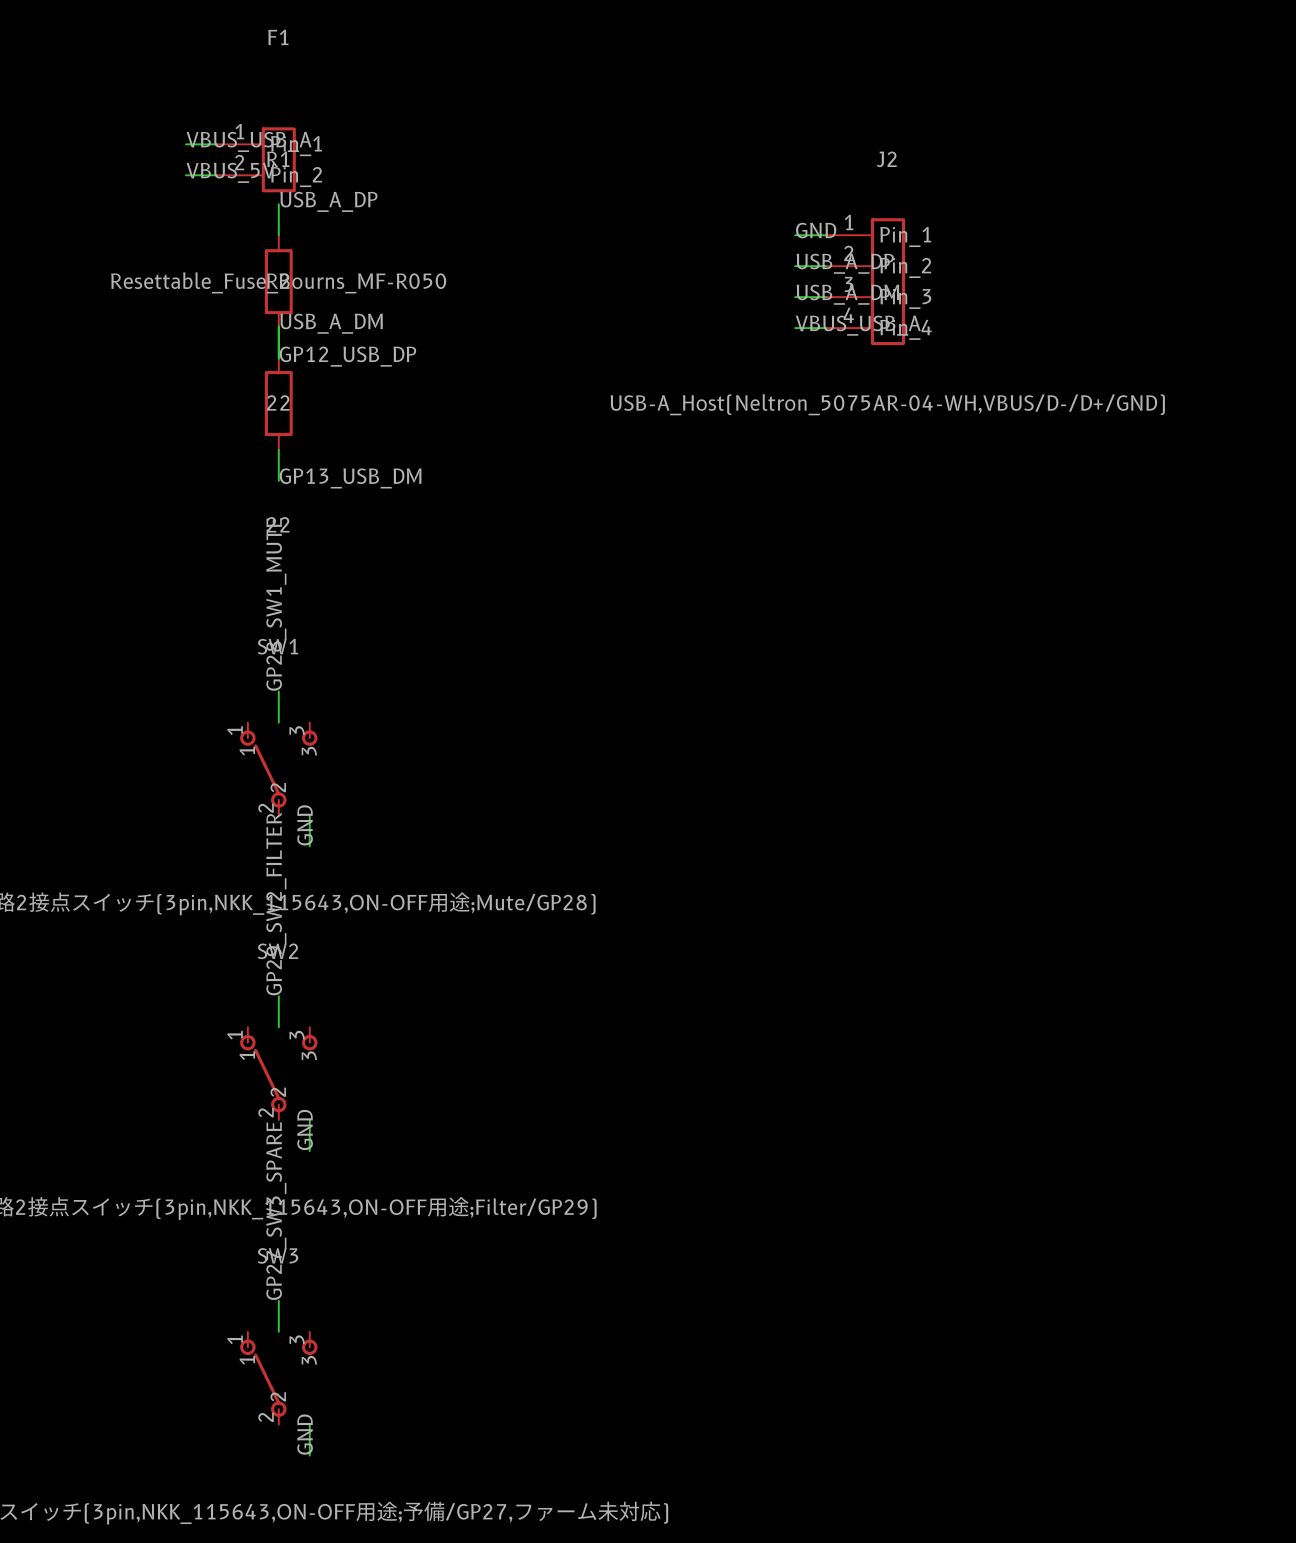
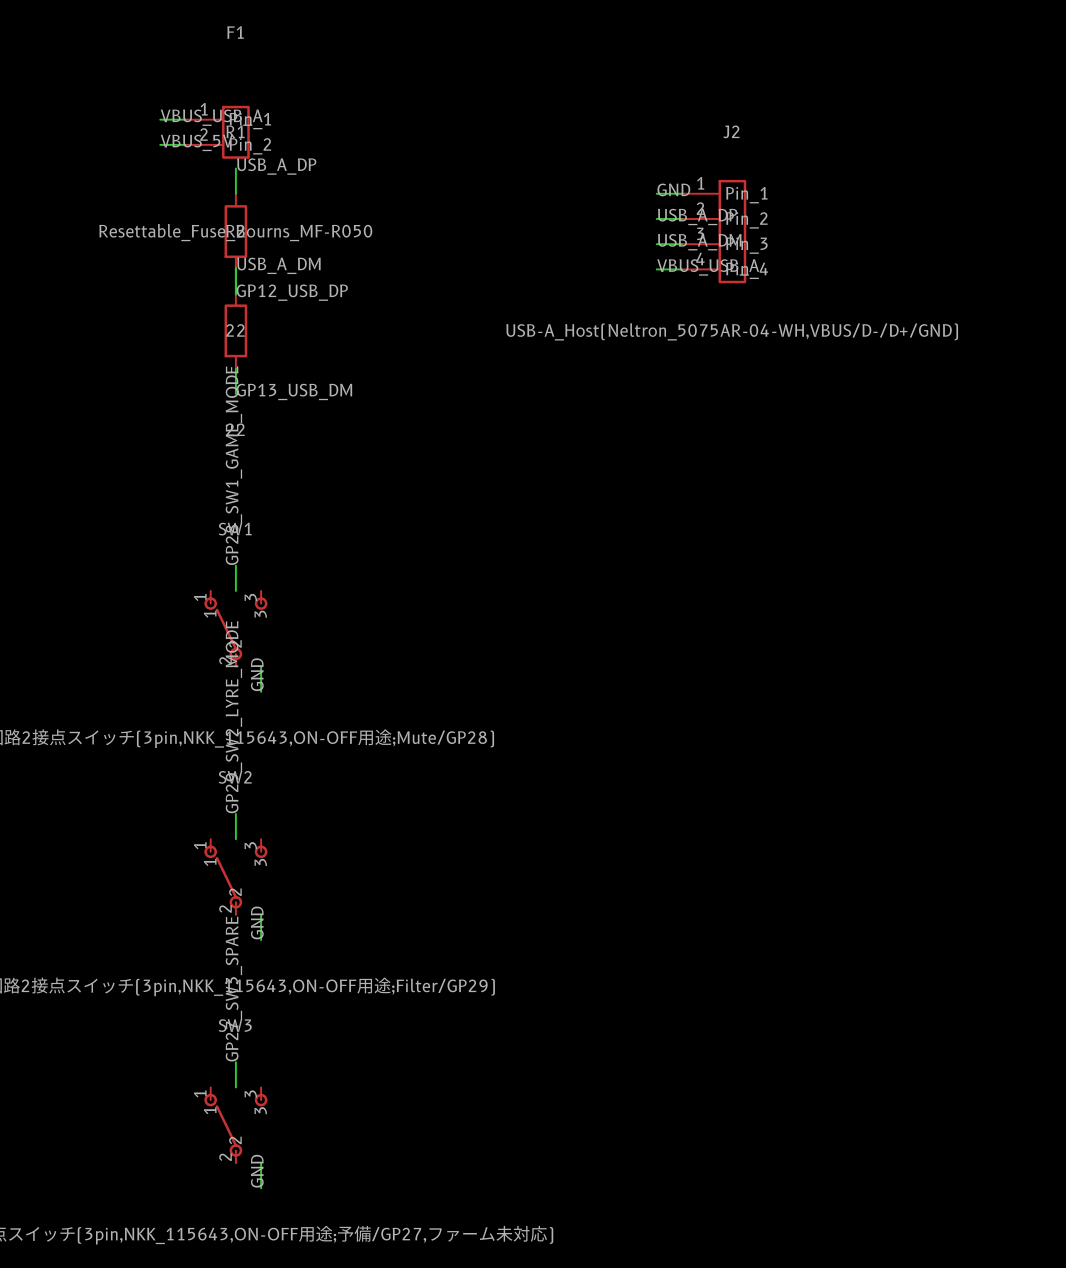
label: GP28_SW1_MUTE (276, 604) -> GP28_SW1_GAME_MODE (233, 465)
label: GP29_SW2_FILTER (276, 904) -> GP29_SW2_LYRE_MODE (233, 717)

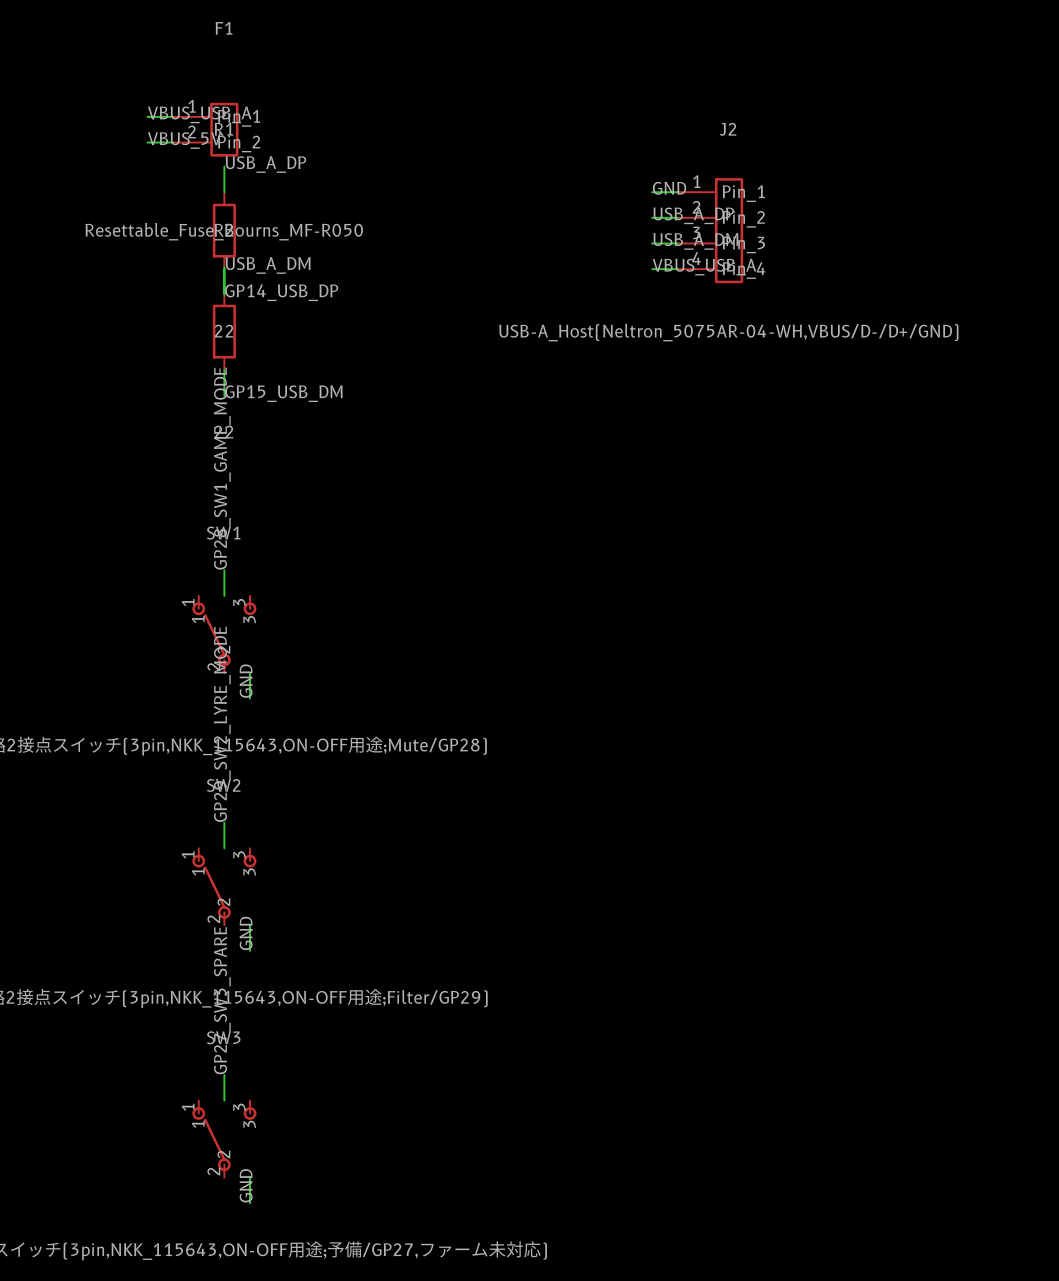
label: GP12_USB_DP (292, 292) -> GP14_USB_DP (281, 292)
label: GP13_USB_DM (294, 391) -> GP15_USB_DM (283, 393)

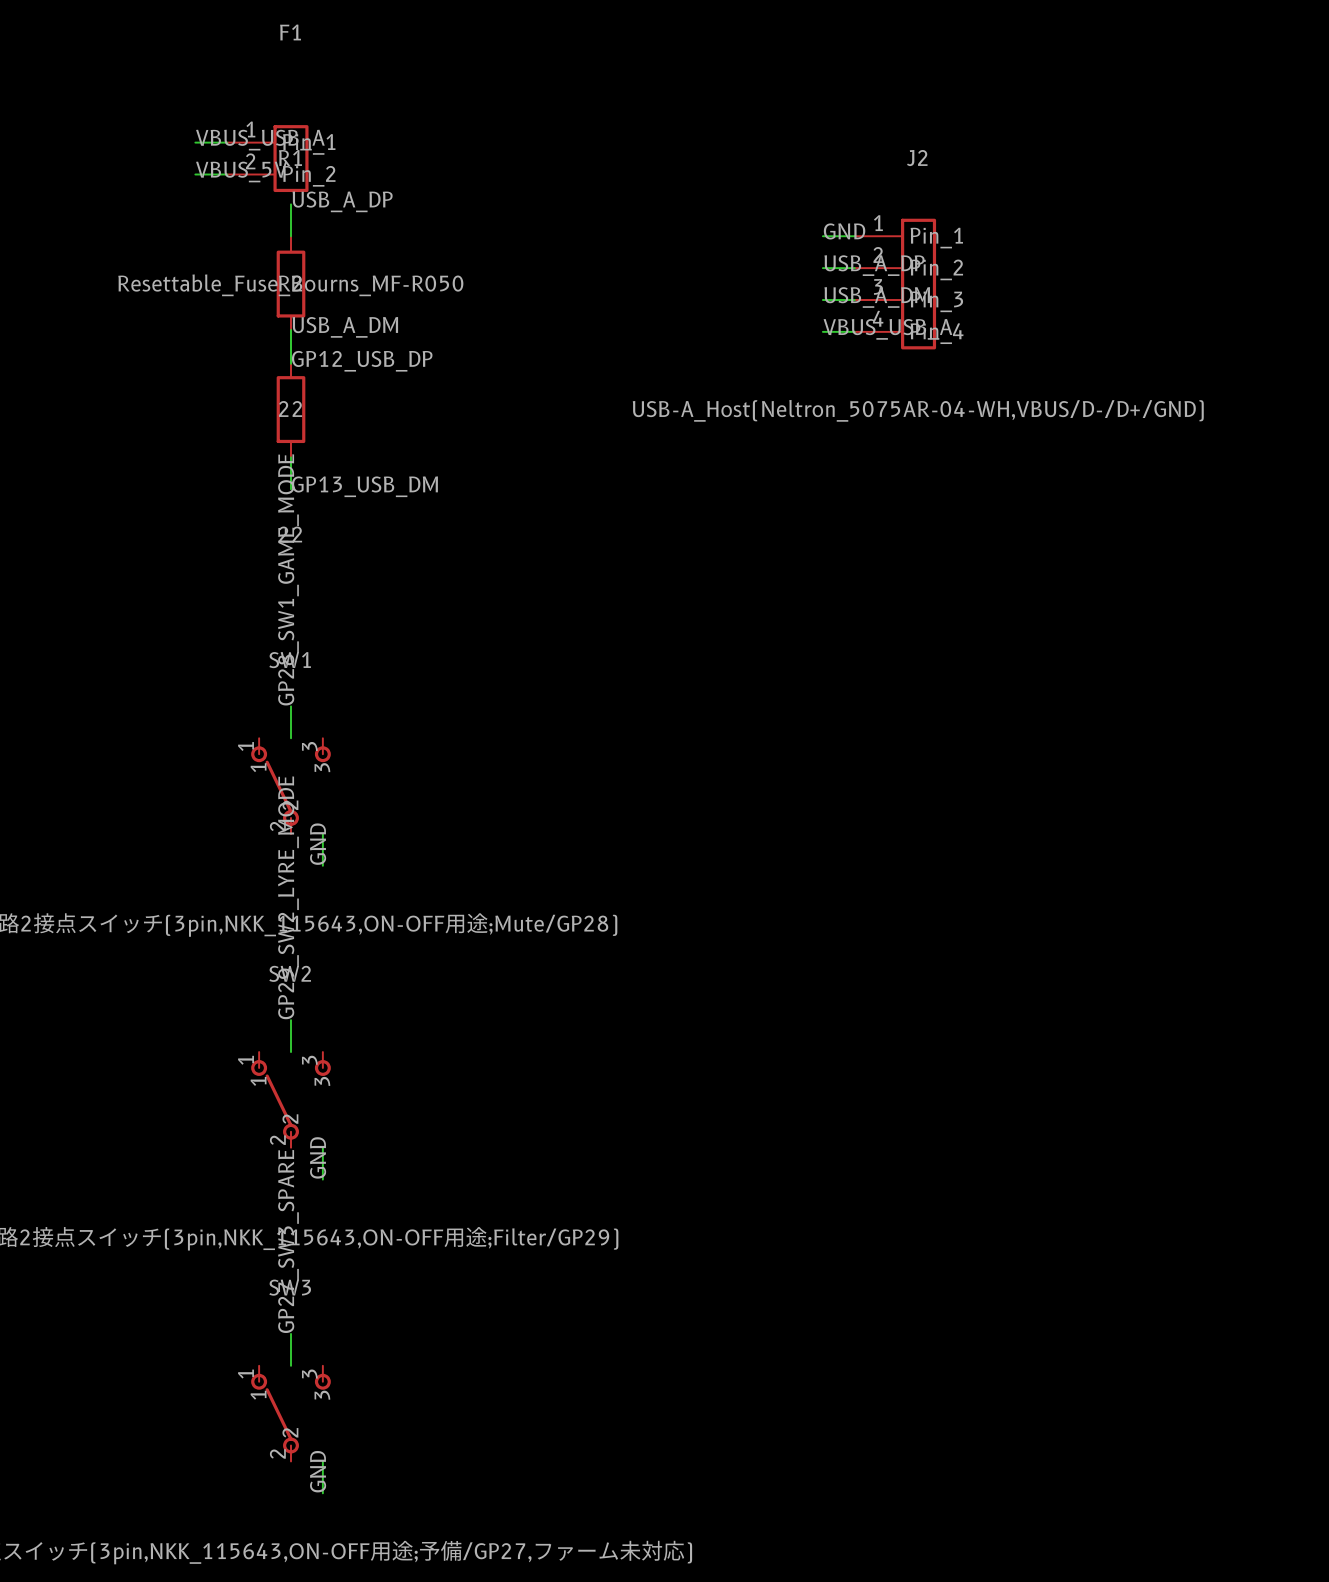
label: GP14_USB_DP (281, 292) -> GP12_USB_DP (362, 361)
label: GP15_USB_DM (283, 393) -> GP13_USB_DM (364, 486)

